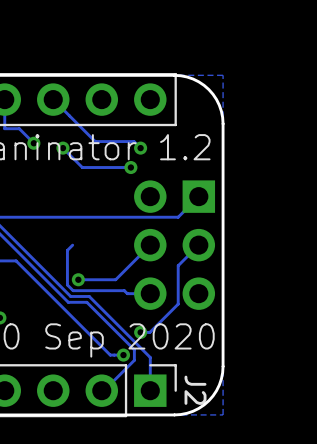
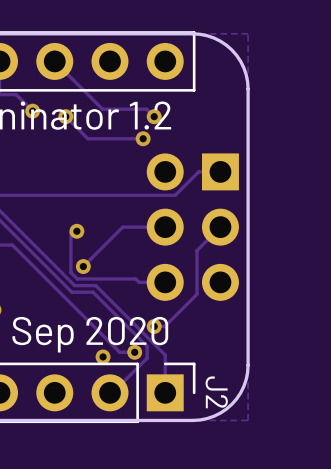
track: (198, 196) (178, 217) (159, 217) -> (220, 171) (198, 171) (175, 195)
track: (150, 245) (115, 279) (78, 279) -> (165, 227) (122, 227) (83, 266)
via: none -> (76, 231)
via: none -> (103, 356)

